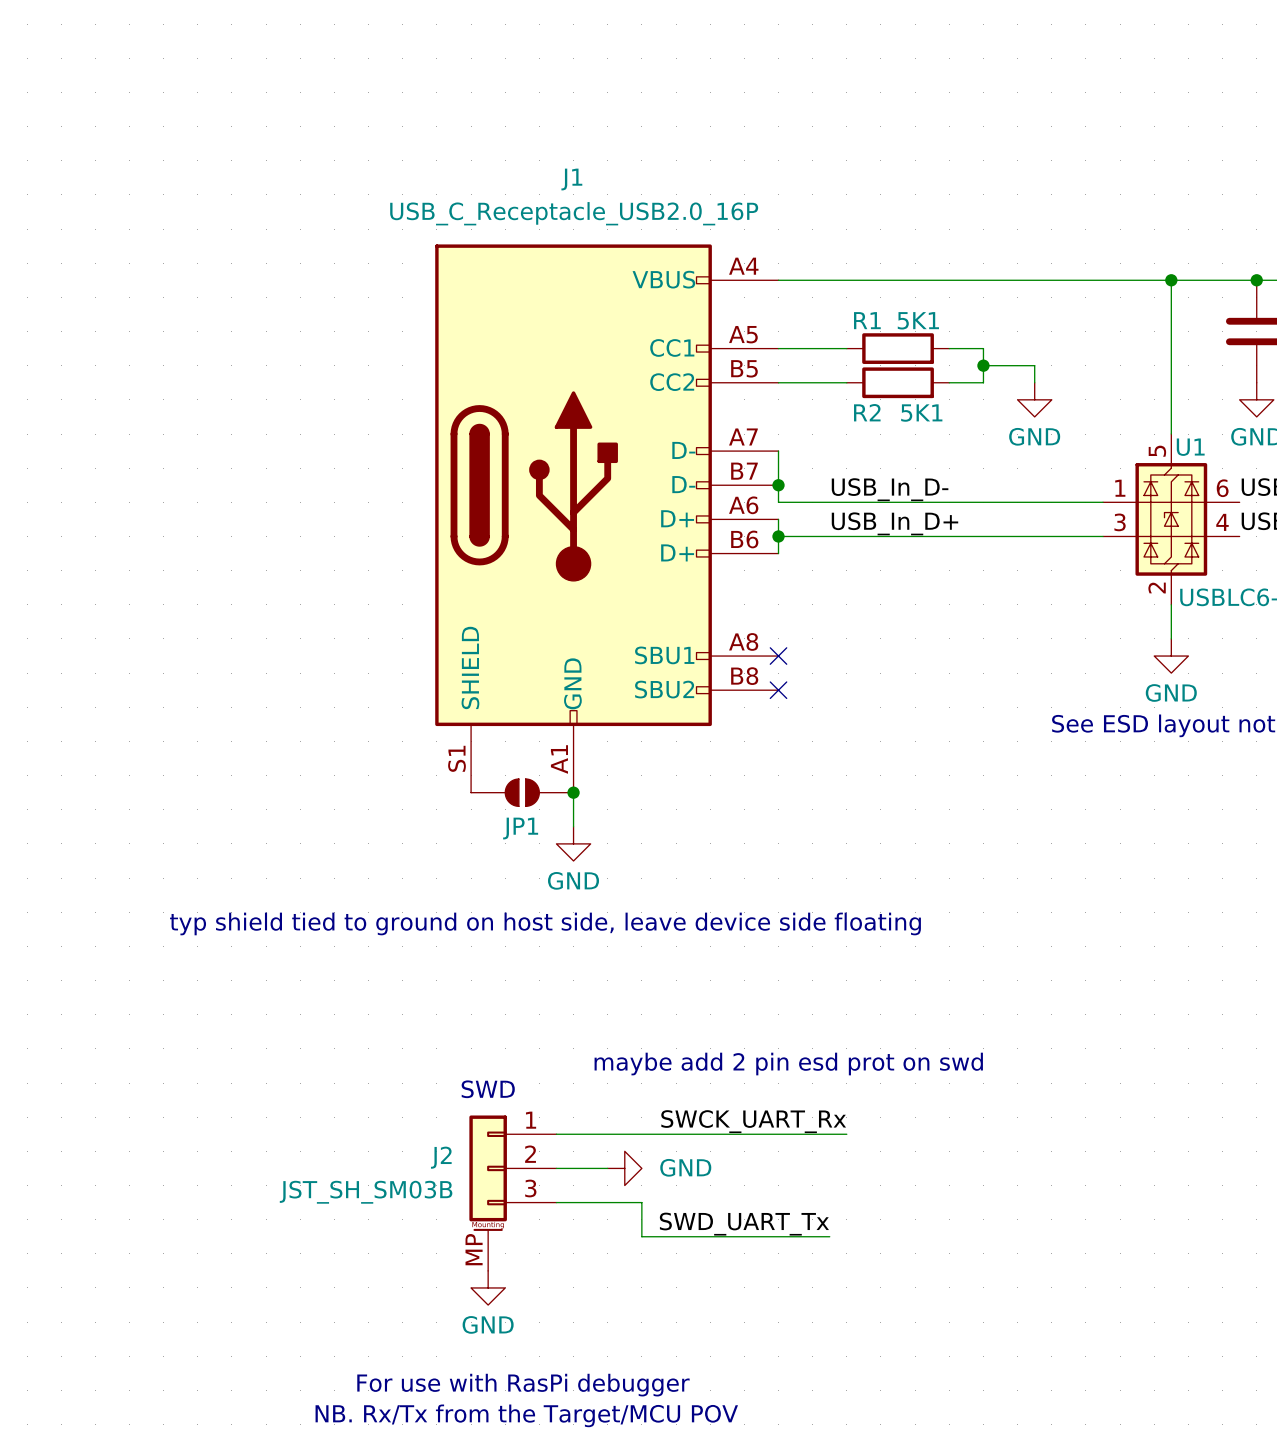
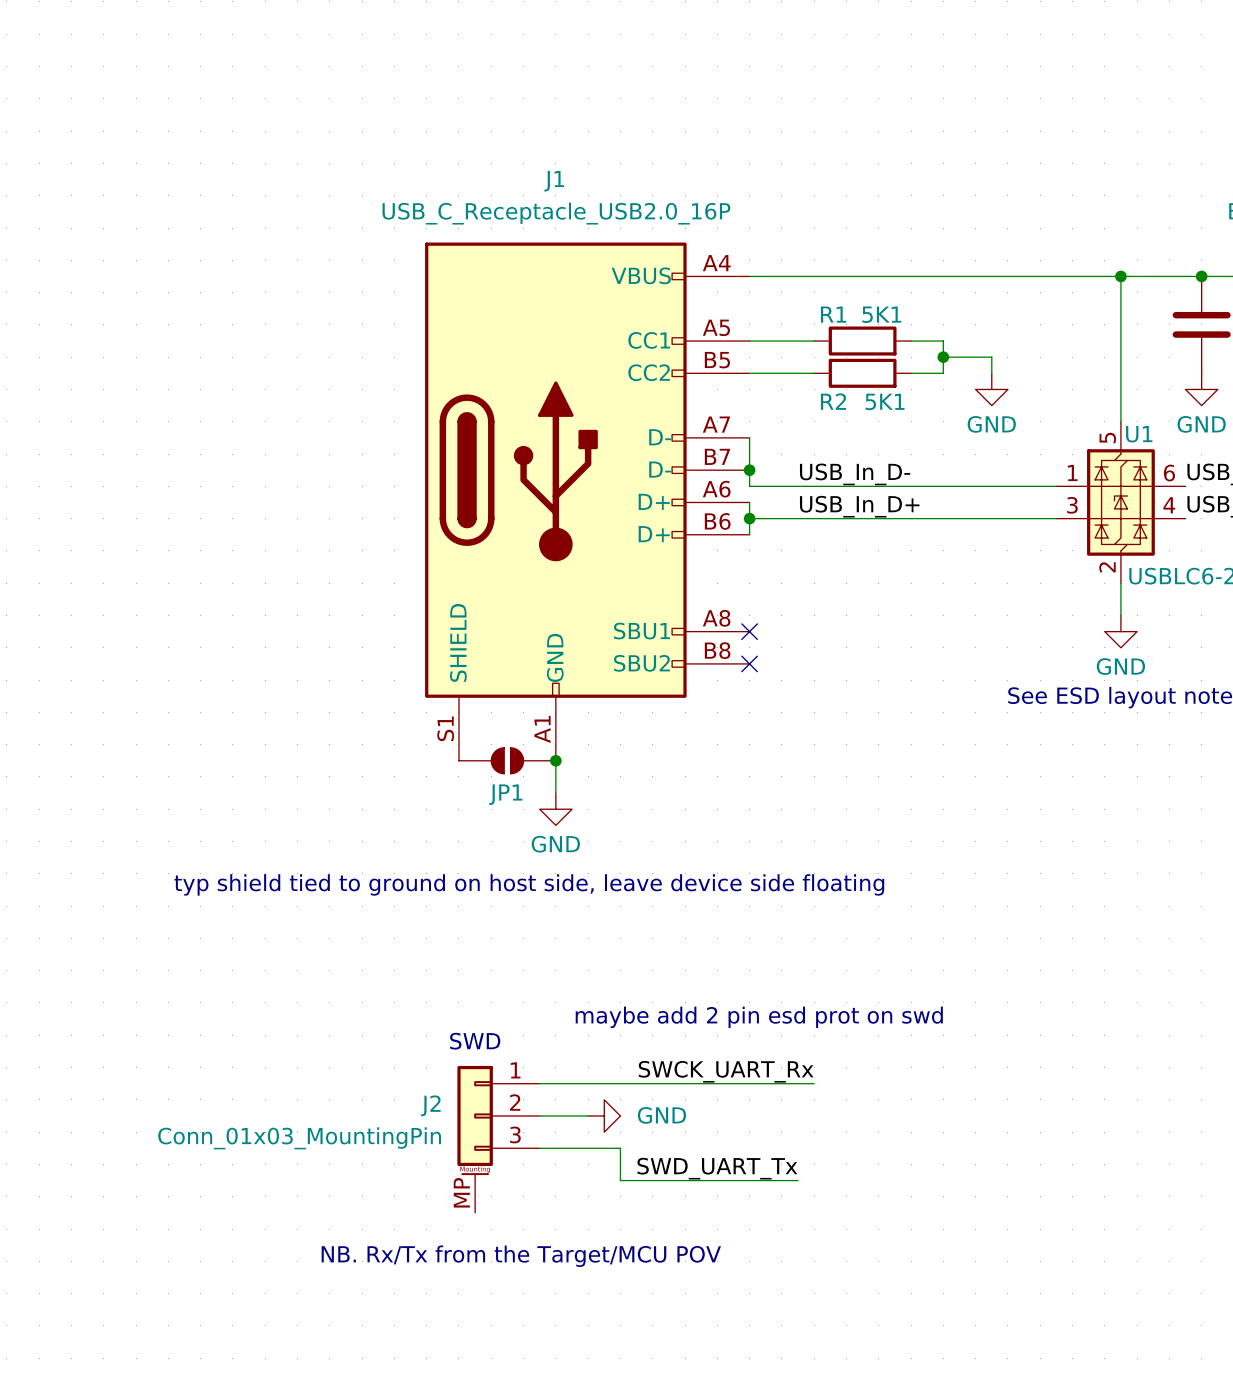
J2 value: JST_SH_SM03B (366, 1192) -> Conn_01x03_MountingPin (299, 1138)
power symbol: GND (488, 1287) -> none
text: For use with RasPi debugger (523, 1385) -> none
text position: NB. Rx/Tx from the Target/MCU POV (526, 1415) -> NB. Rx/Tx from the Target/MCU POV (521, 1256)

